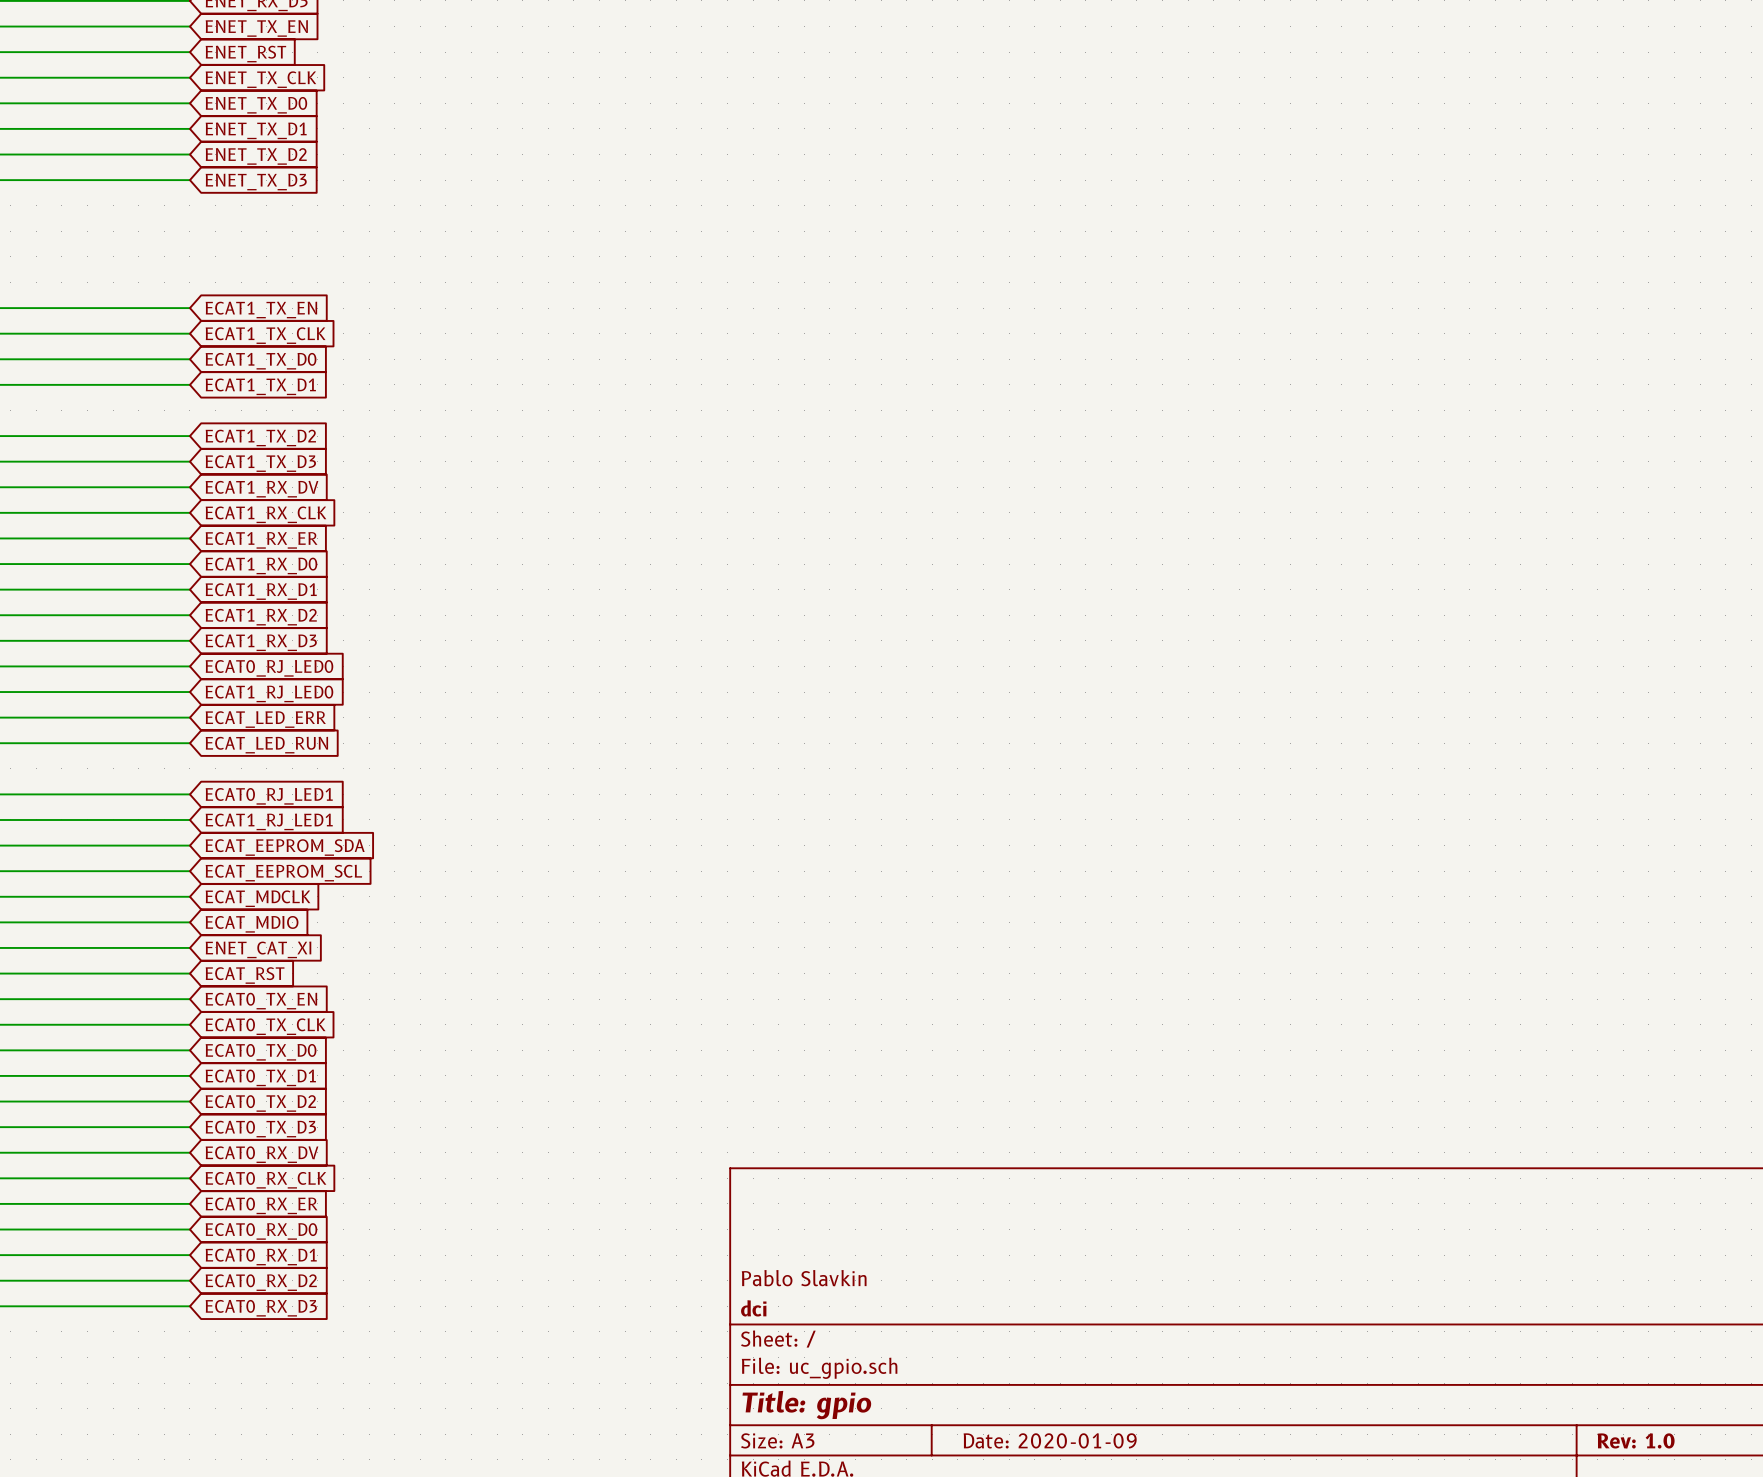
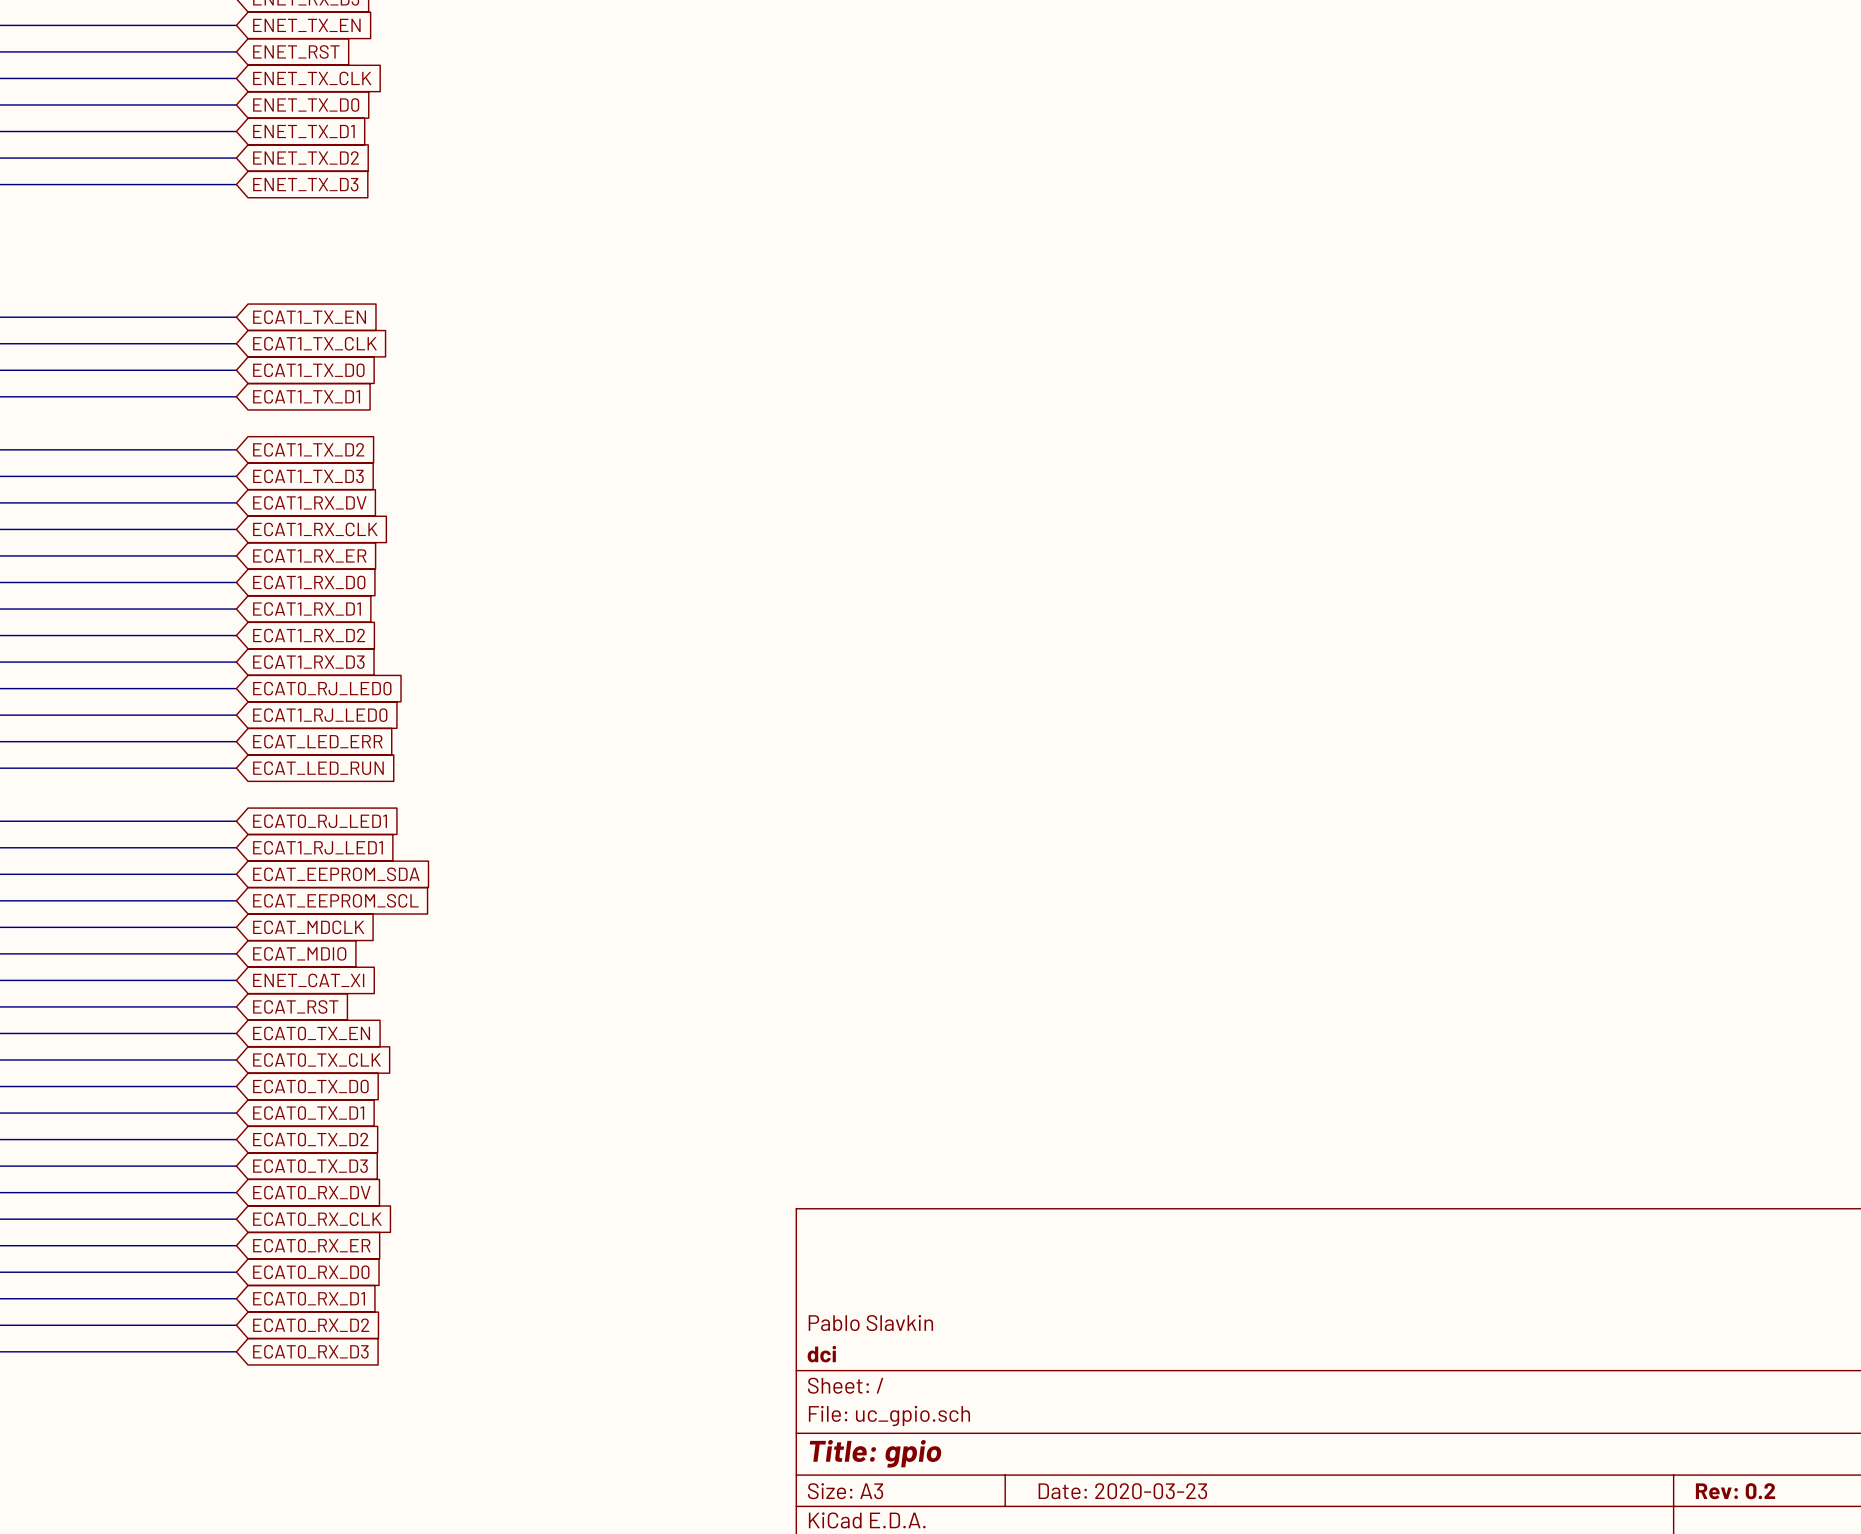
title block: Date: 2020-01-09 (1050, 1440) -> Date: 2020-03-23 (1122, 1491)
title block: Rev: 1.0 (1636, 1440) -> Rev: 0.2 (1735, 1491)

